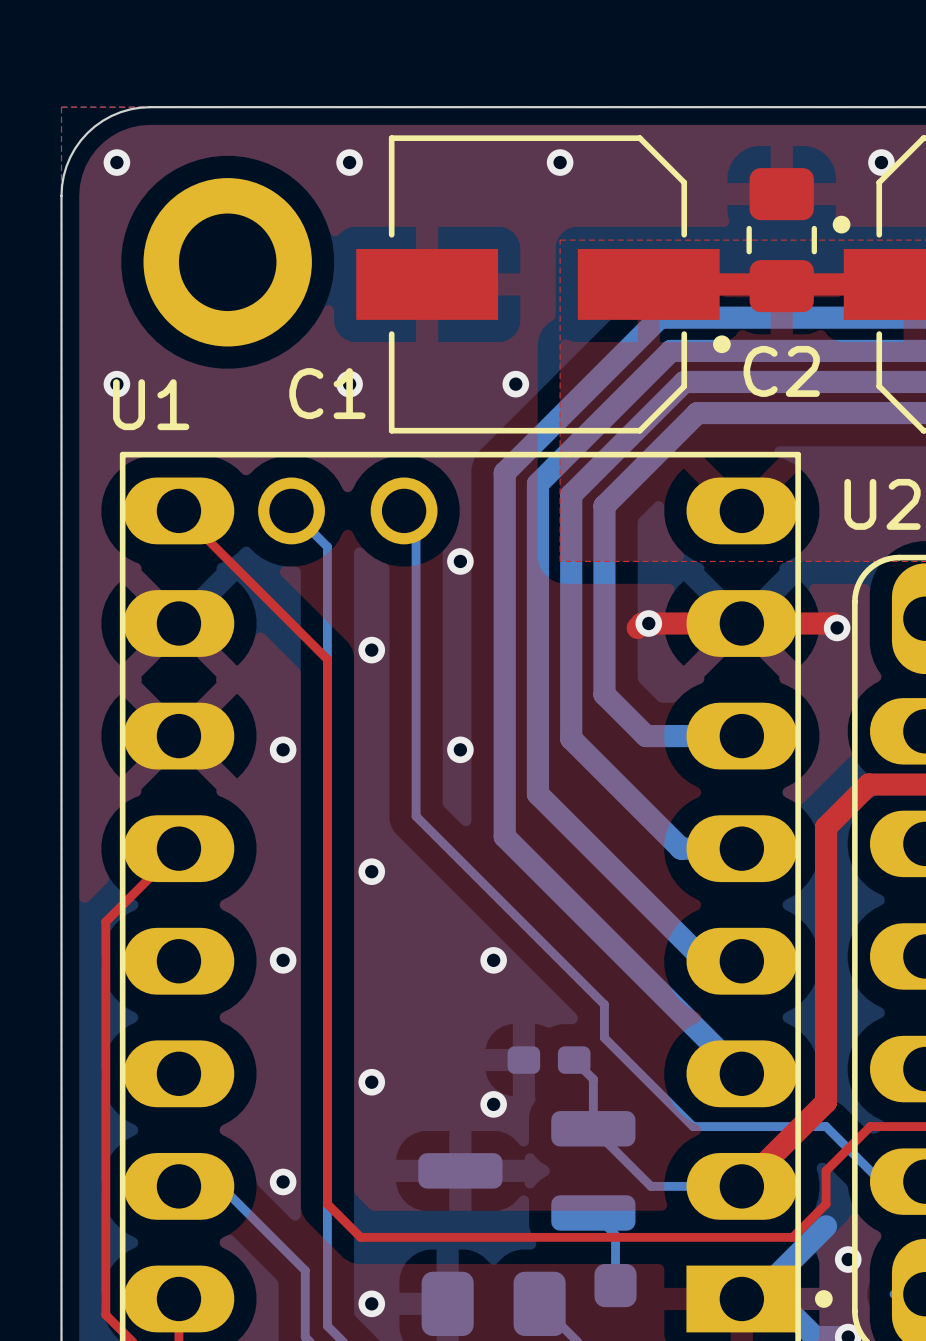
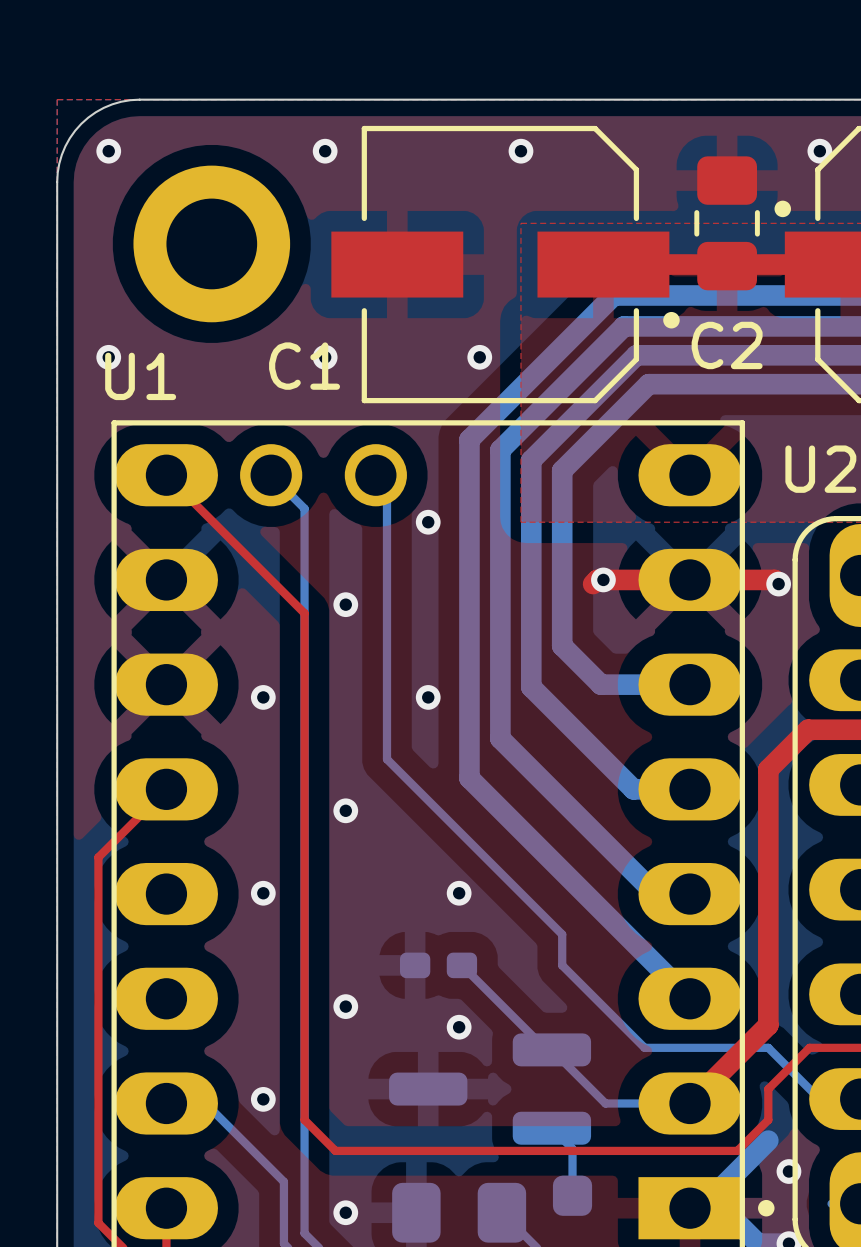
bottom track: none -> (461, 965) (546, 1049)
part position: (549, 1060) -> (438, 965)
bottom track: (574, 1060) (593, 1079) (593, 1128) -> none

